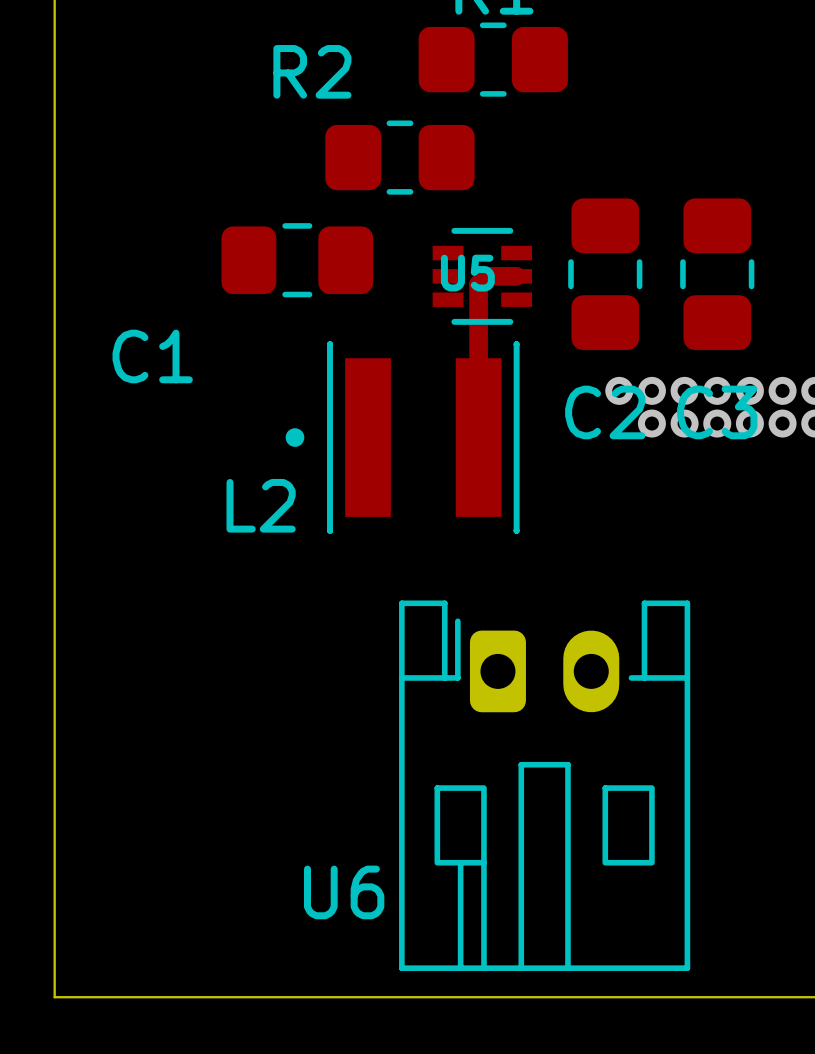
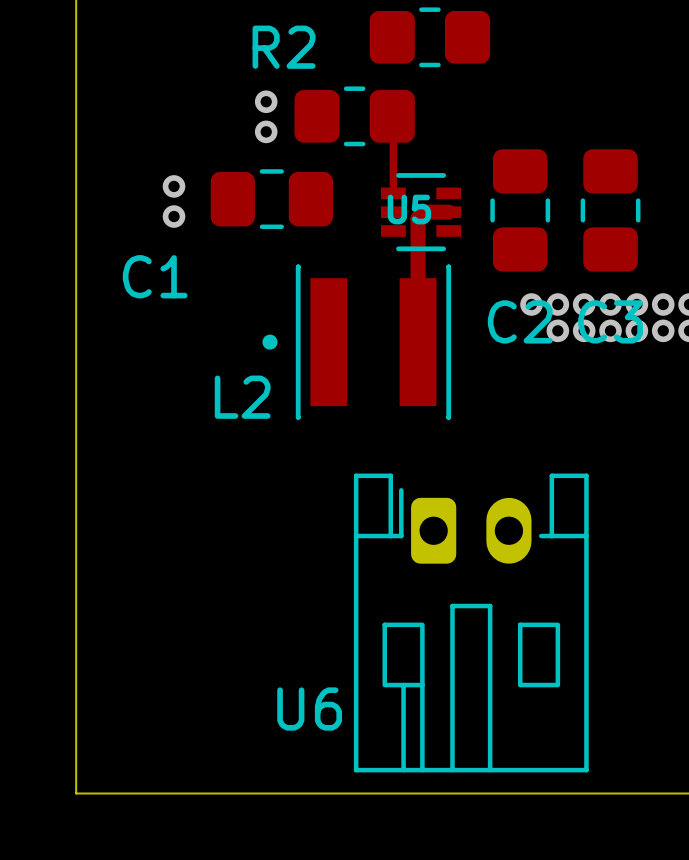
via: none -> (266, 101)
track: none -> (392, 116) (393, 193)
via: none -> (266, 131)
via: none -> (174, 186)
via: none -> (174, 216)

